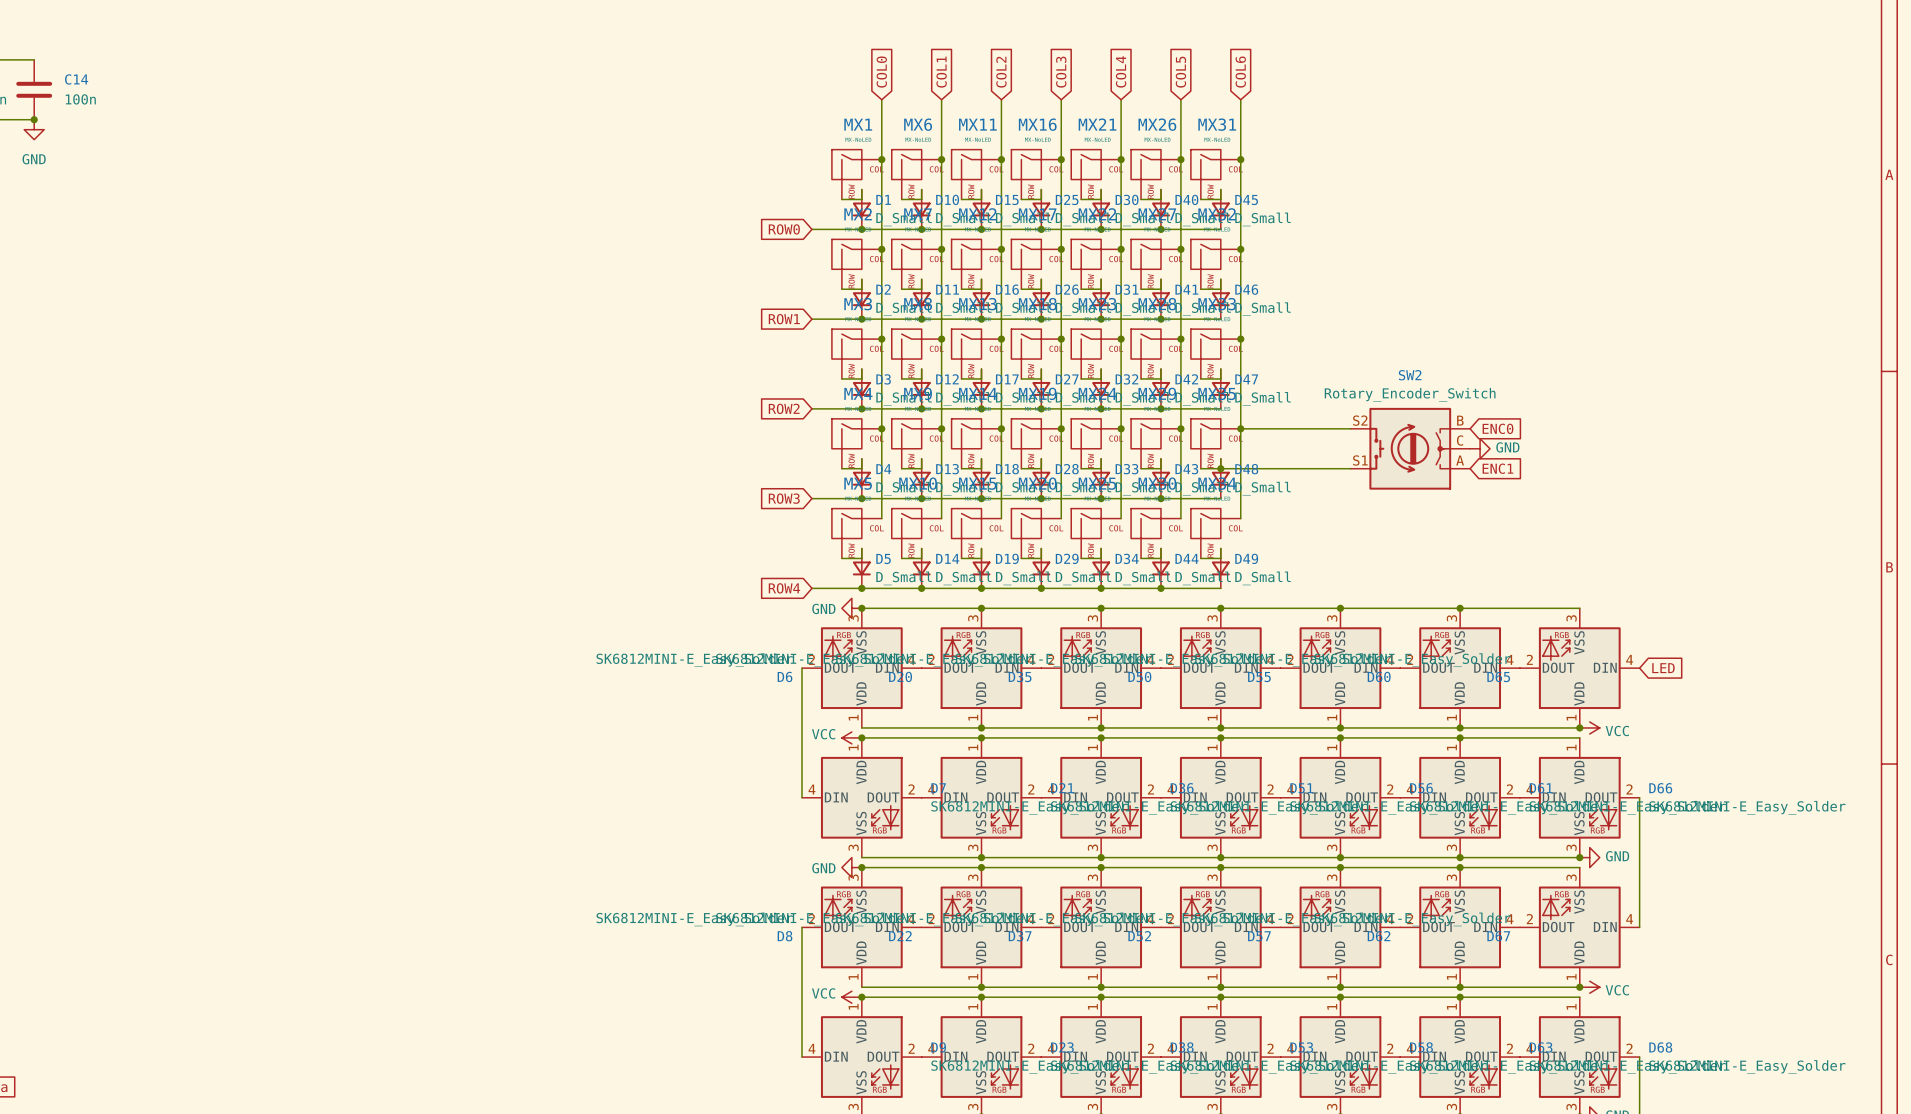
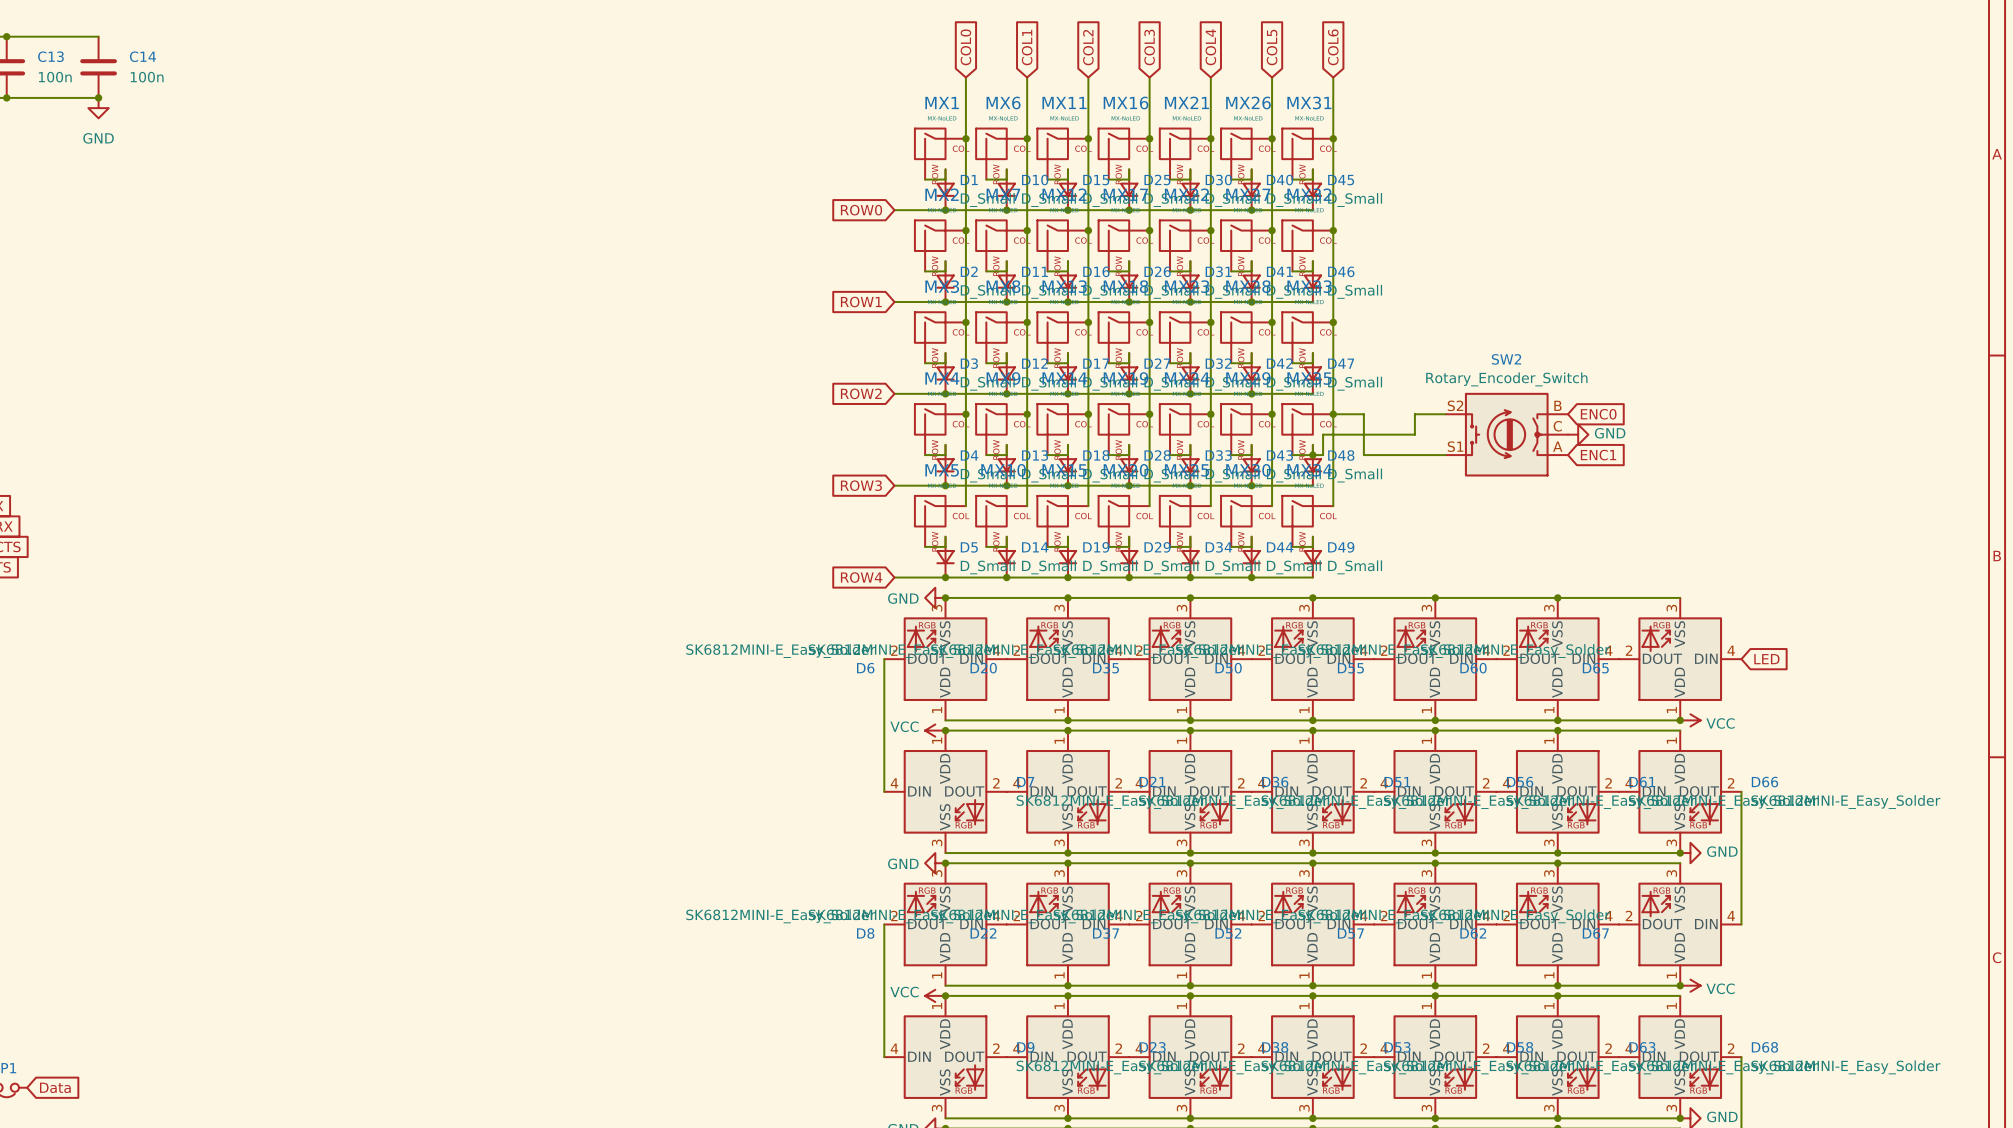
wire: (1270, 428) (1320, 428) -> (1323, 455) (1323, 434) (1414, 434) (1414, 414)
wire: (1230, 468) (1270, 468) -> (1363, 414) (1363, 455)

